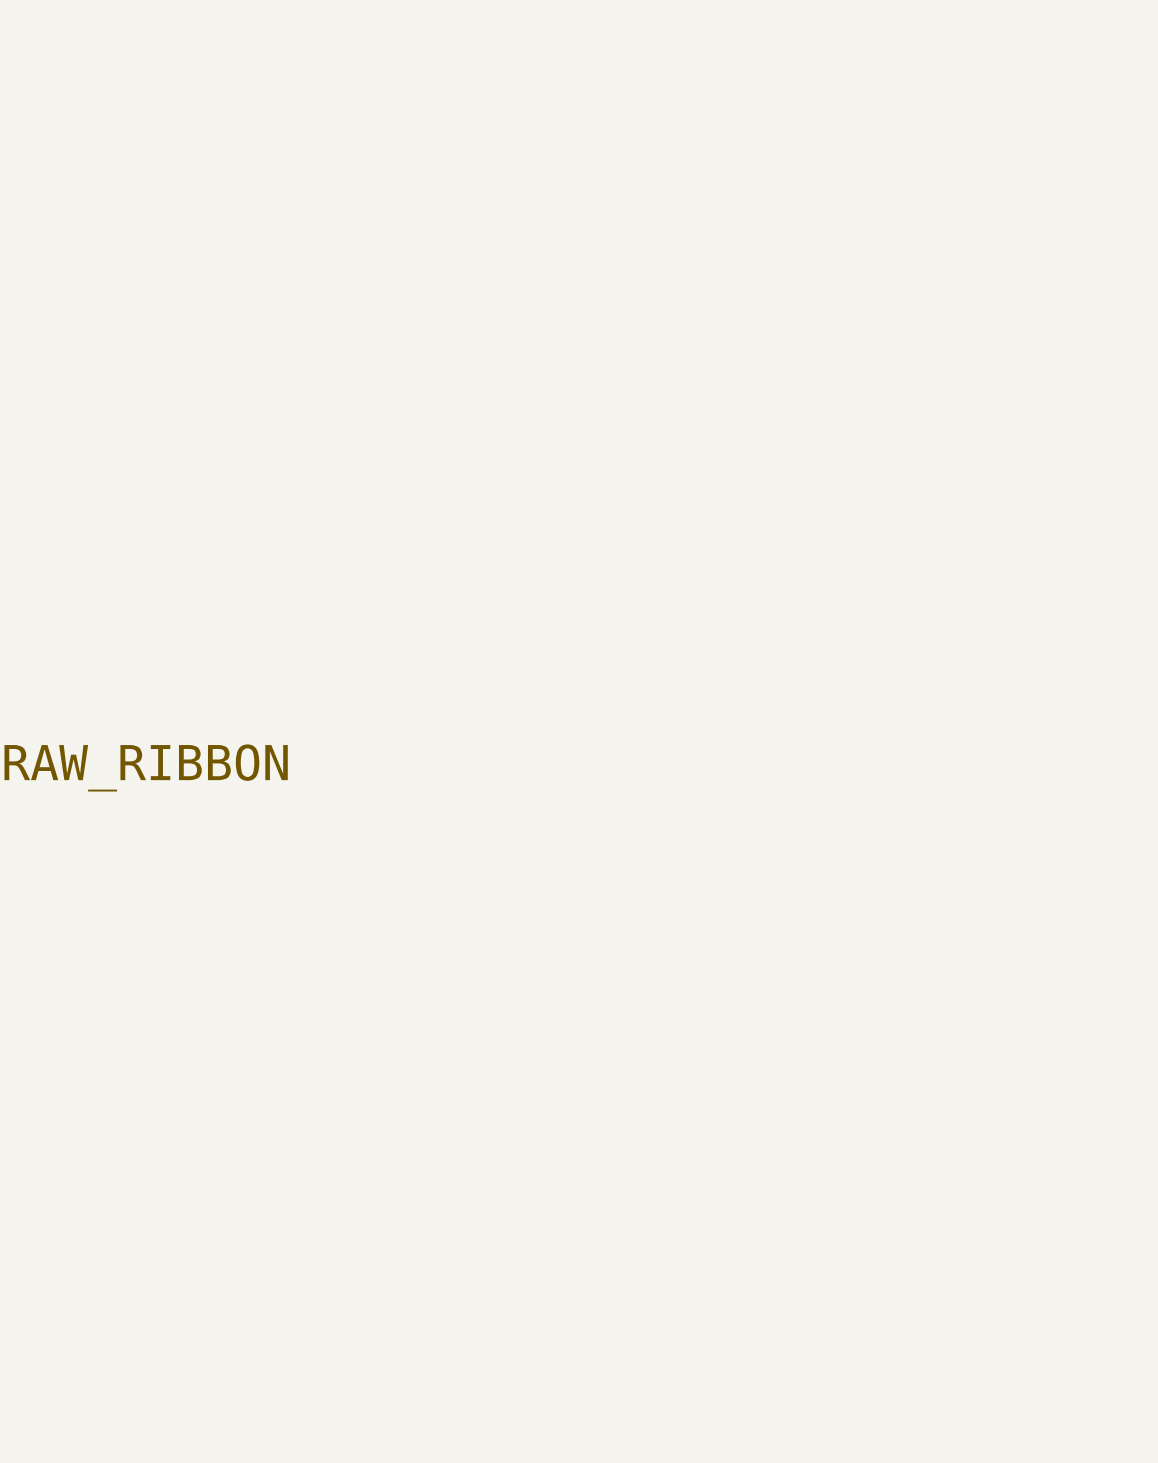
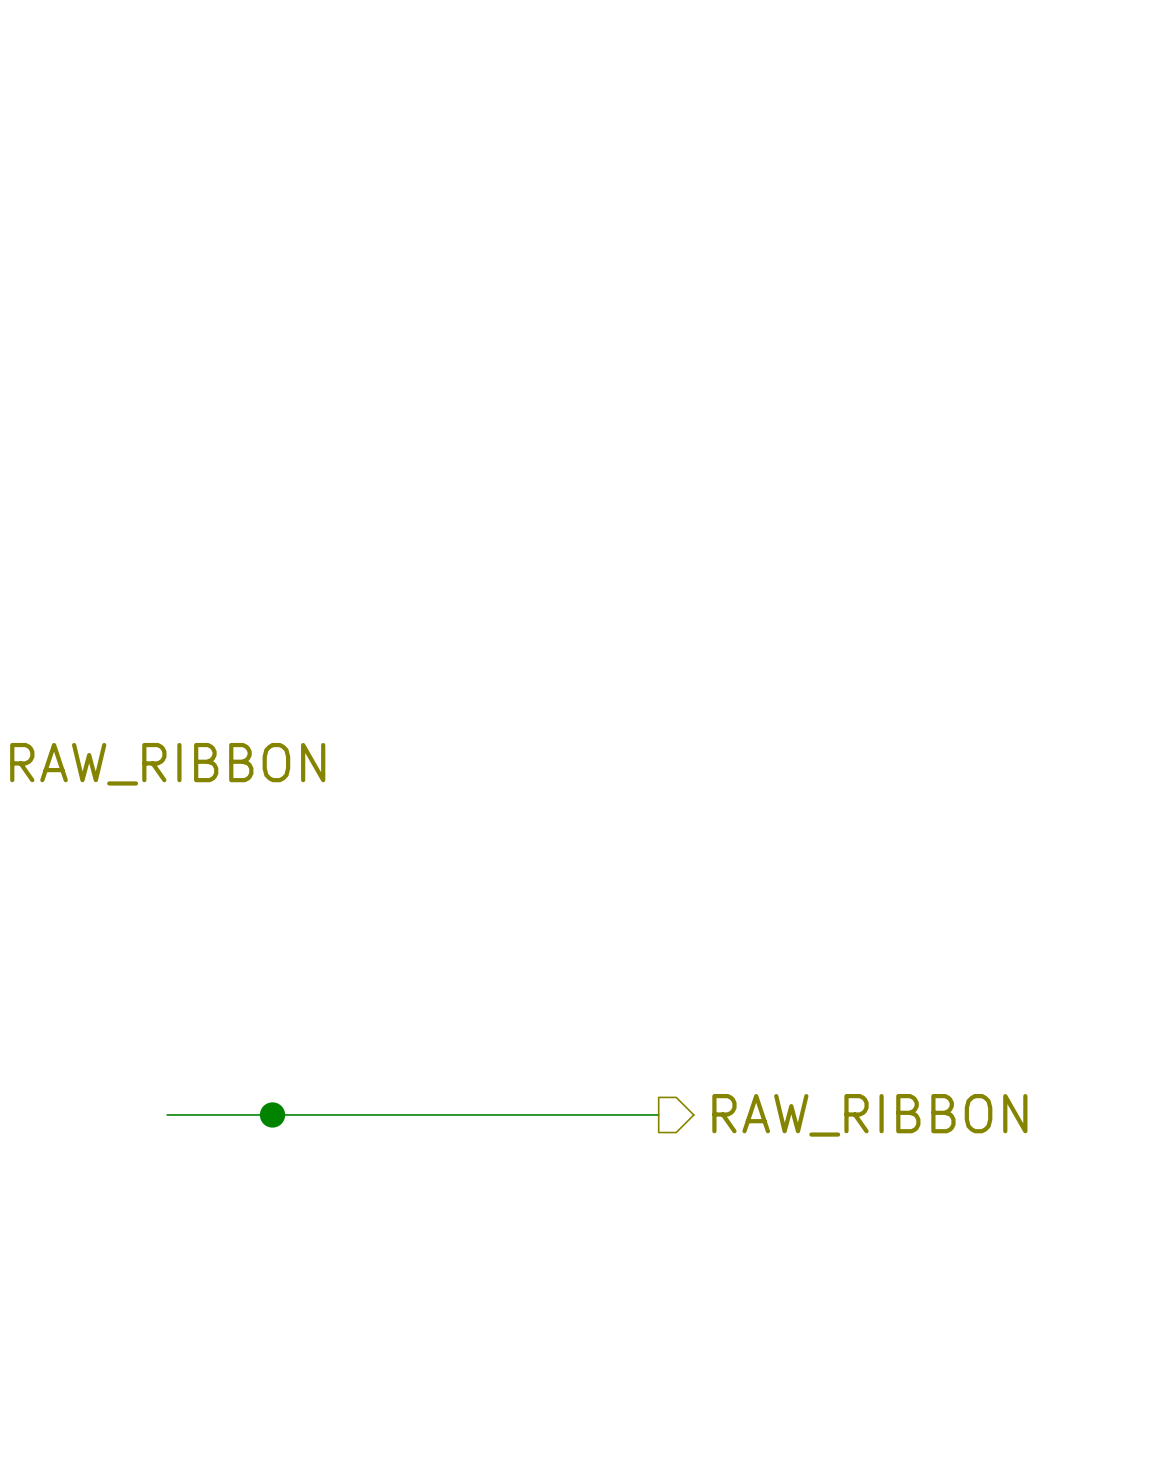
wire: none -> (167, 1114) (658, 1114)
junction: none -> (272, 1114)
hierarchical label: none -> RAW_RIBBON (869, 1115)

